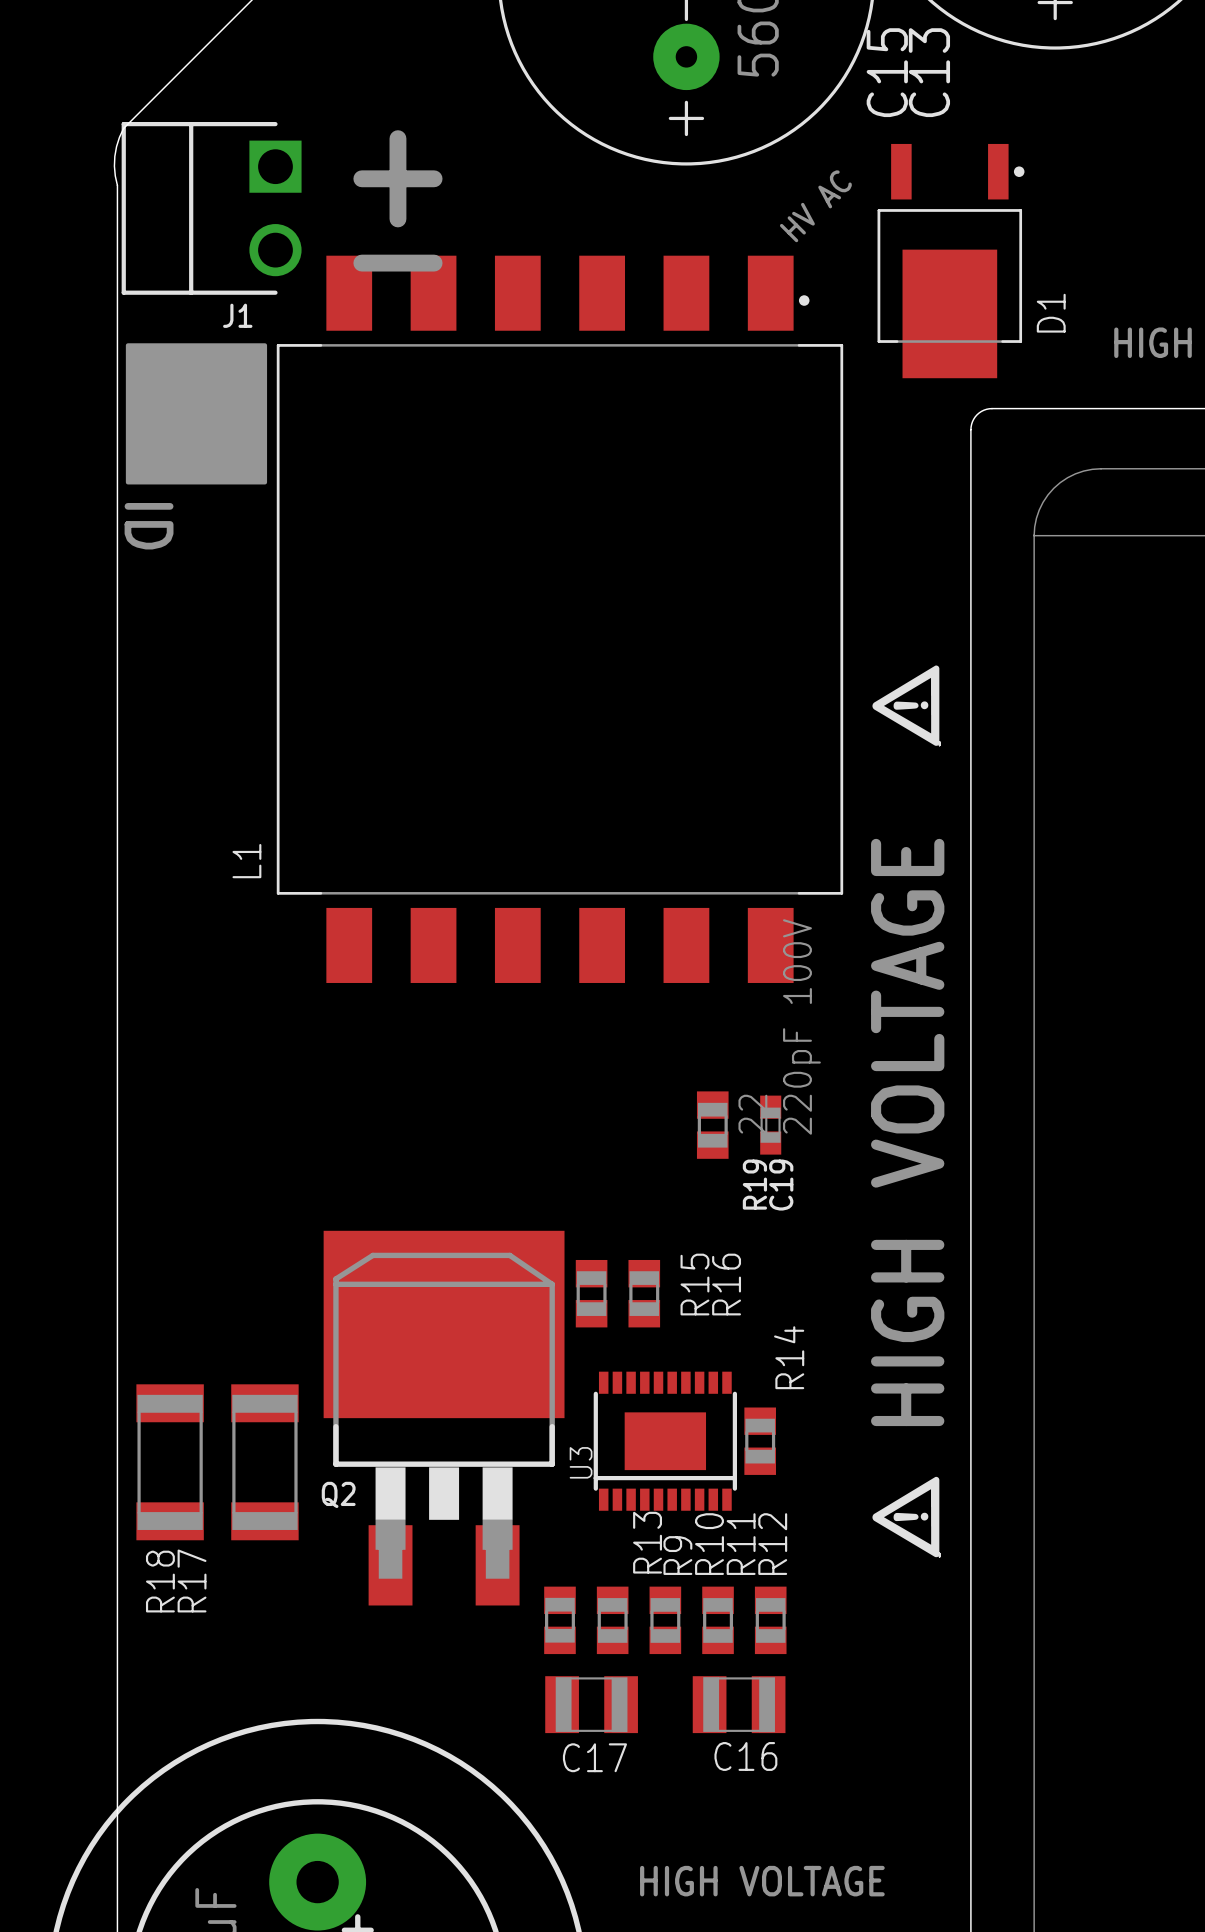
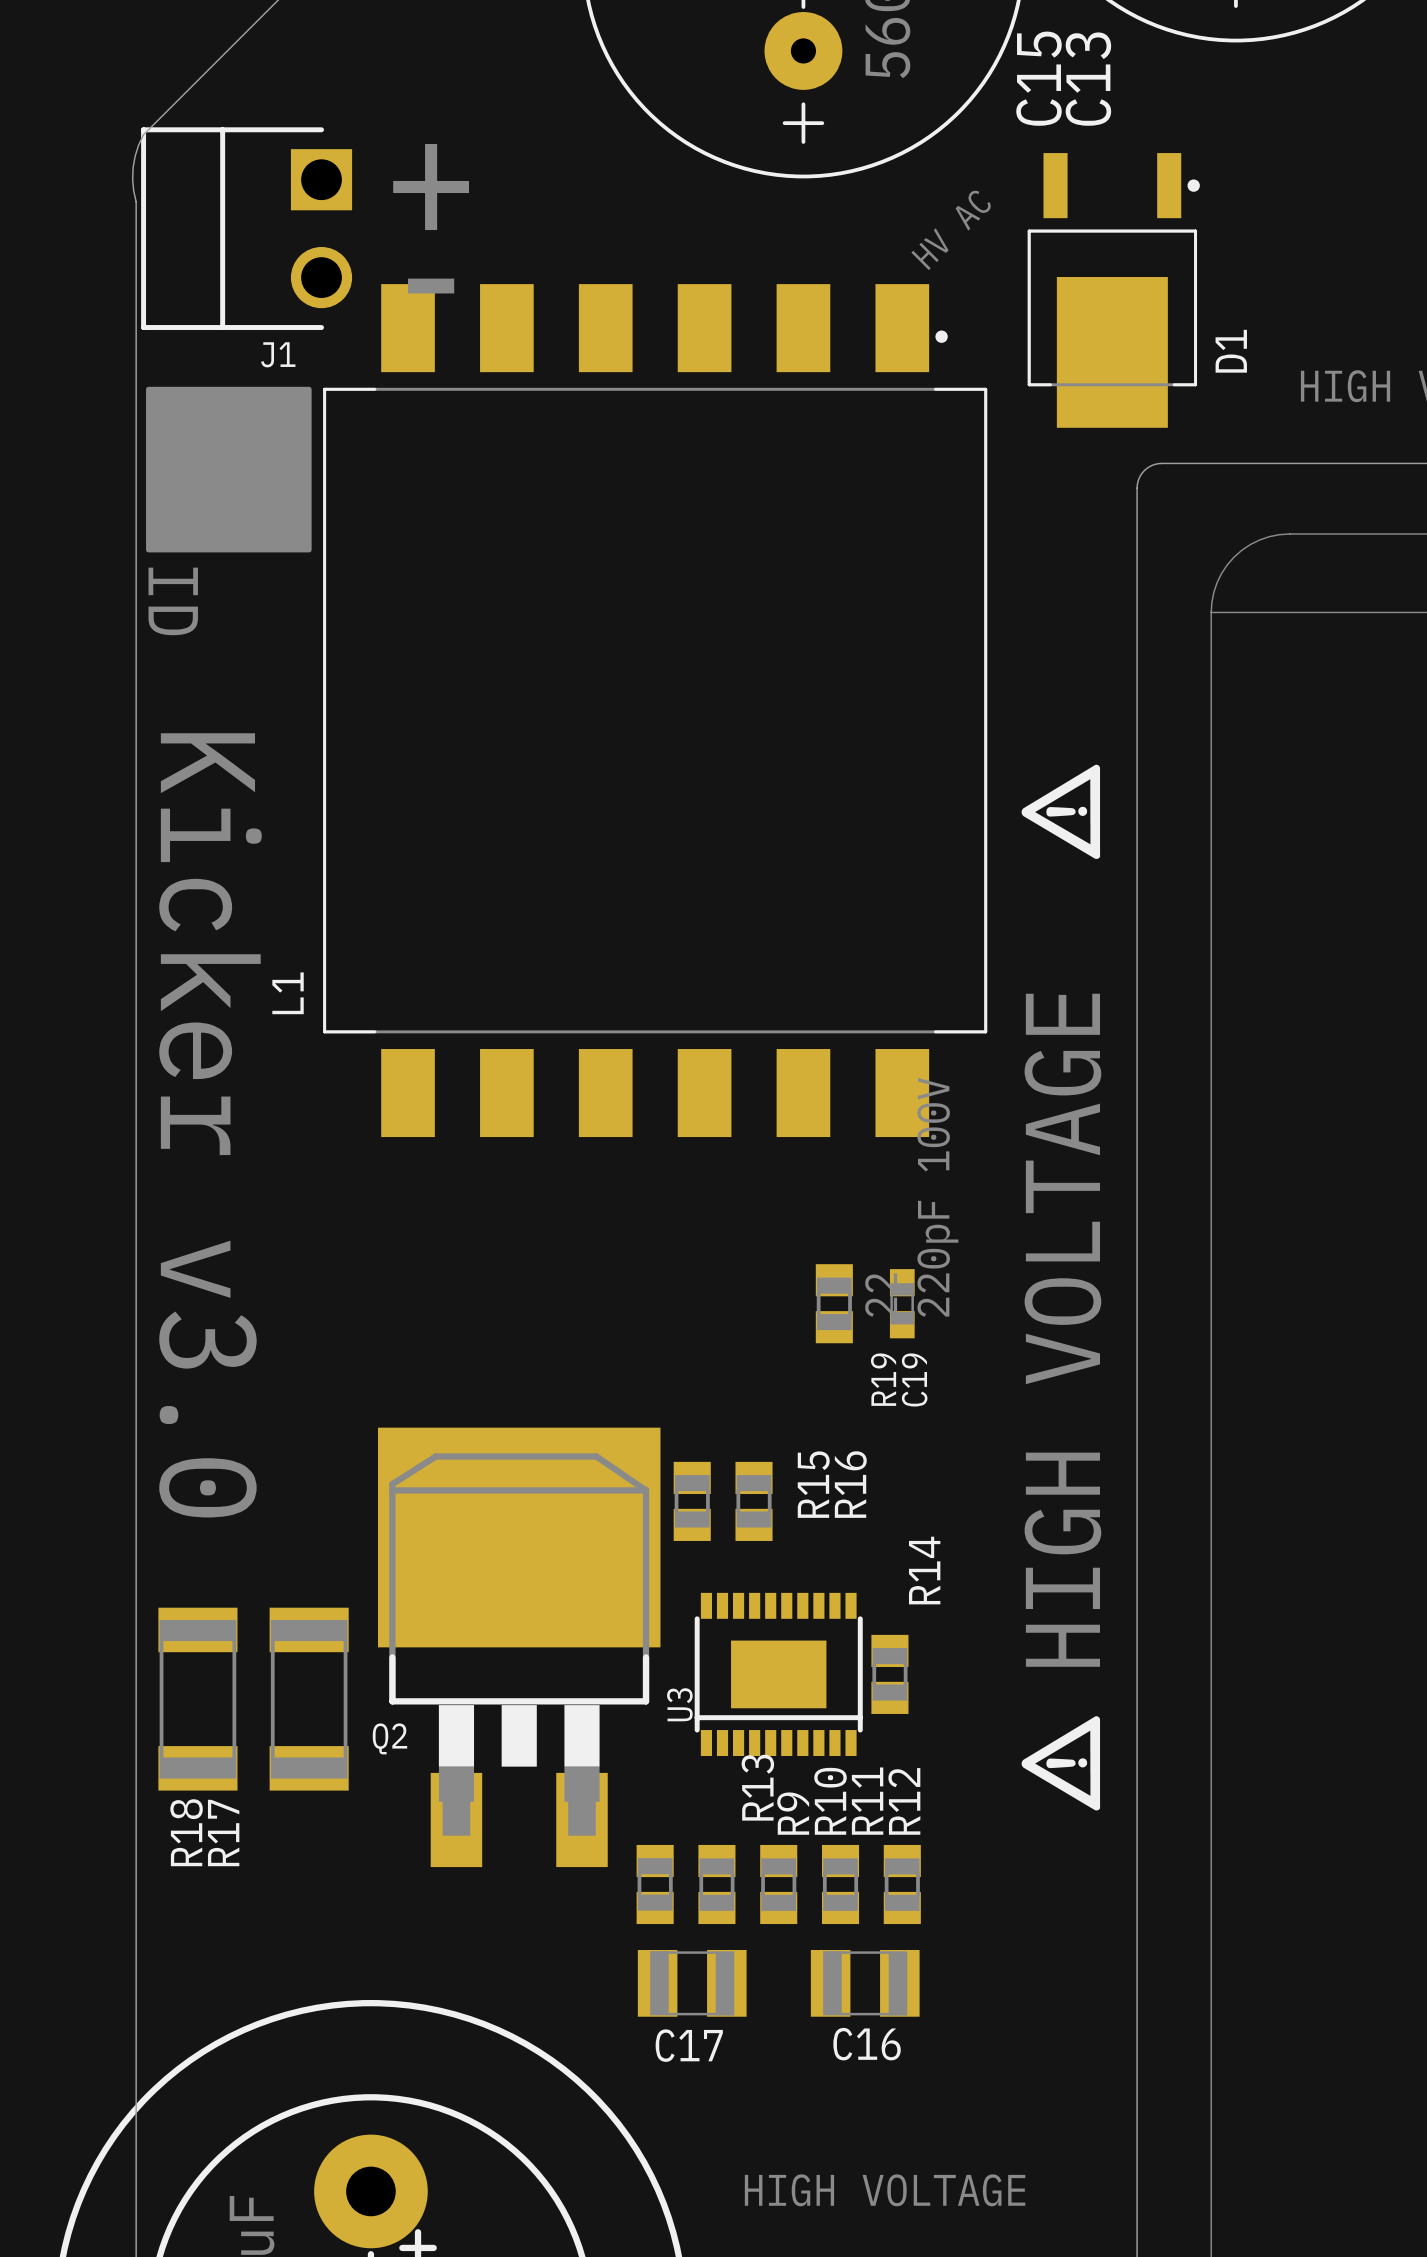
text: none -> Kicker v3.0 (210, 1125)

